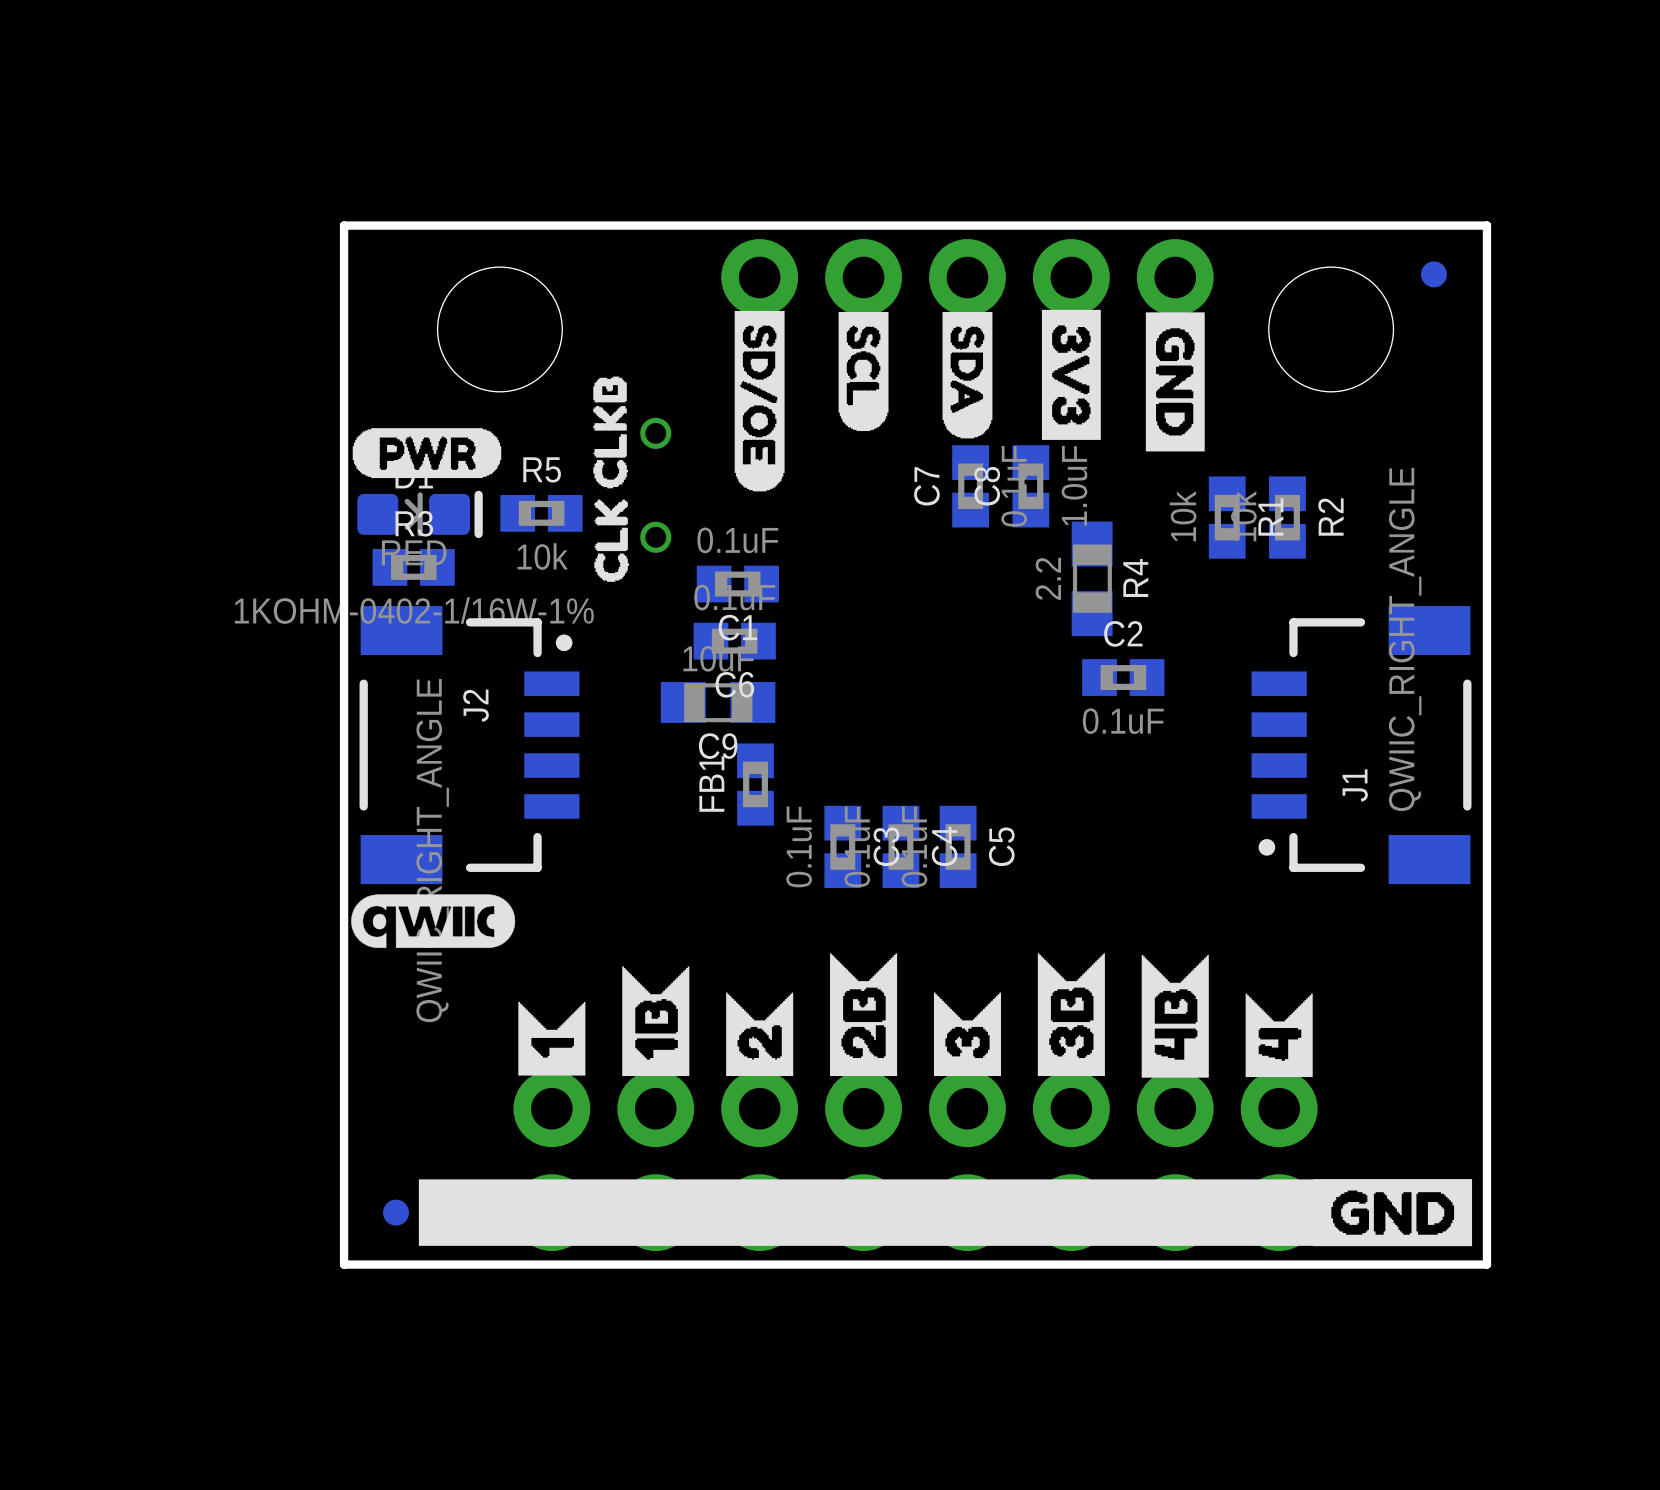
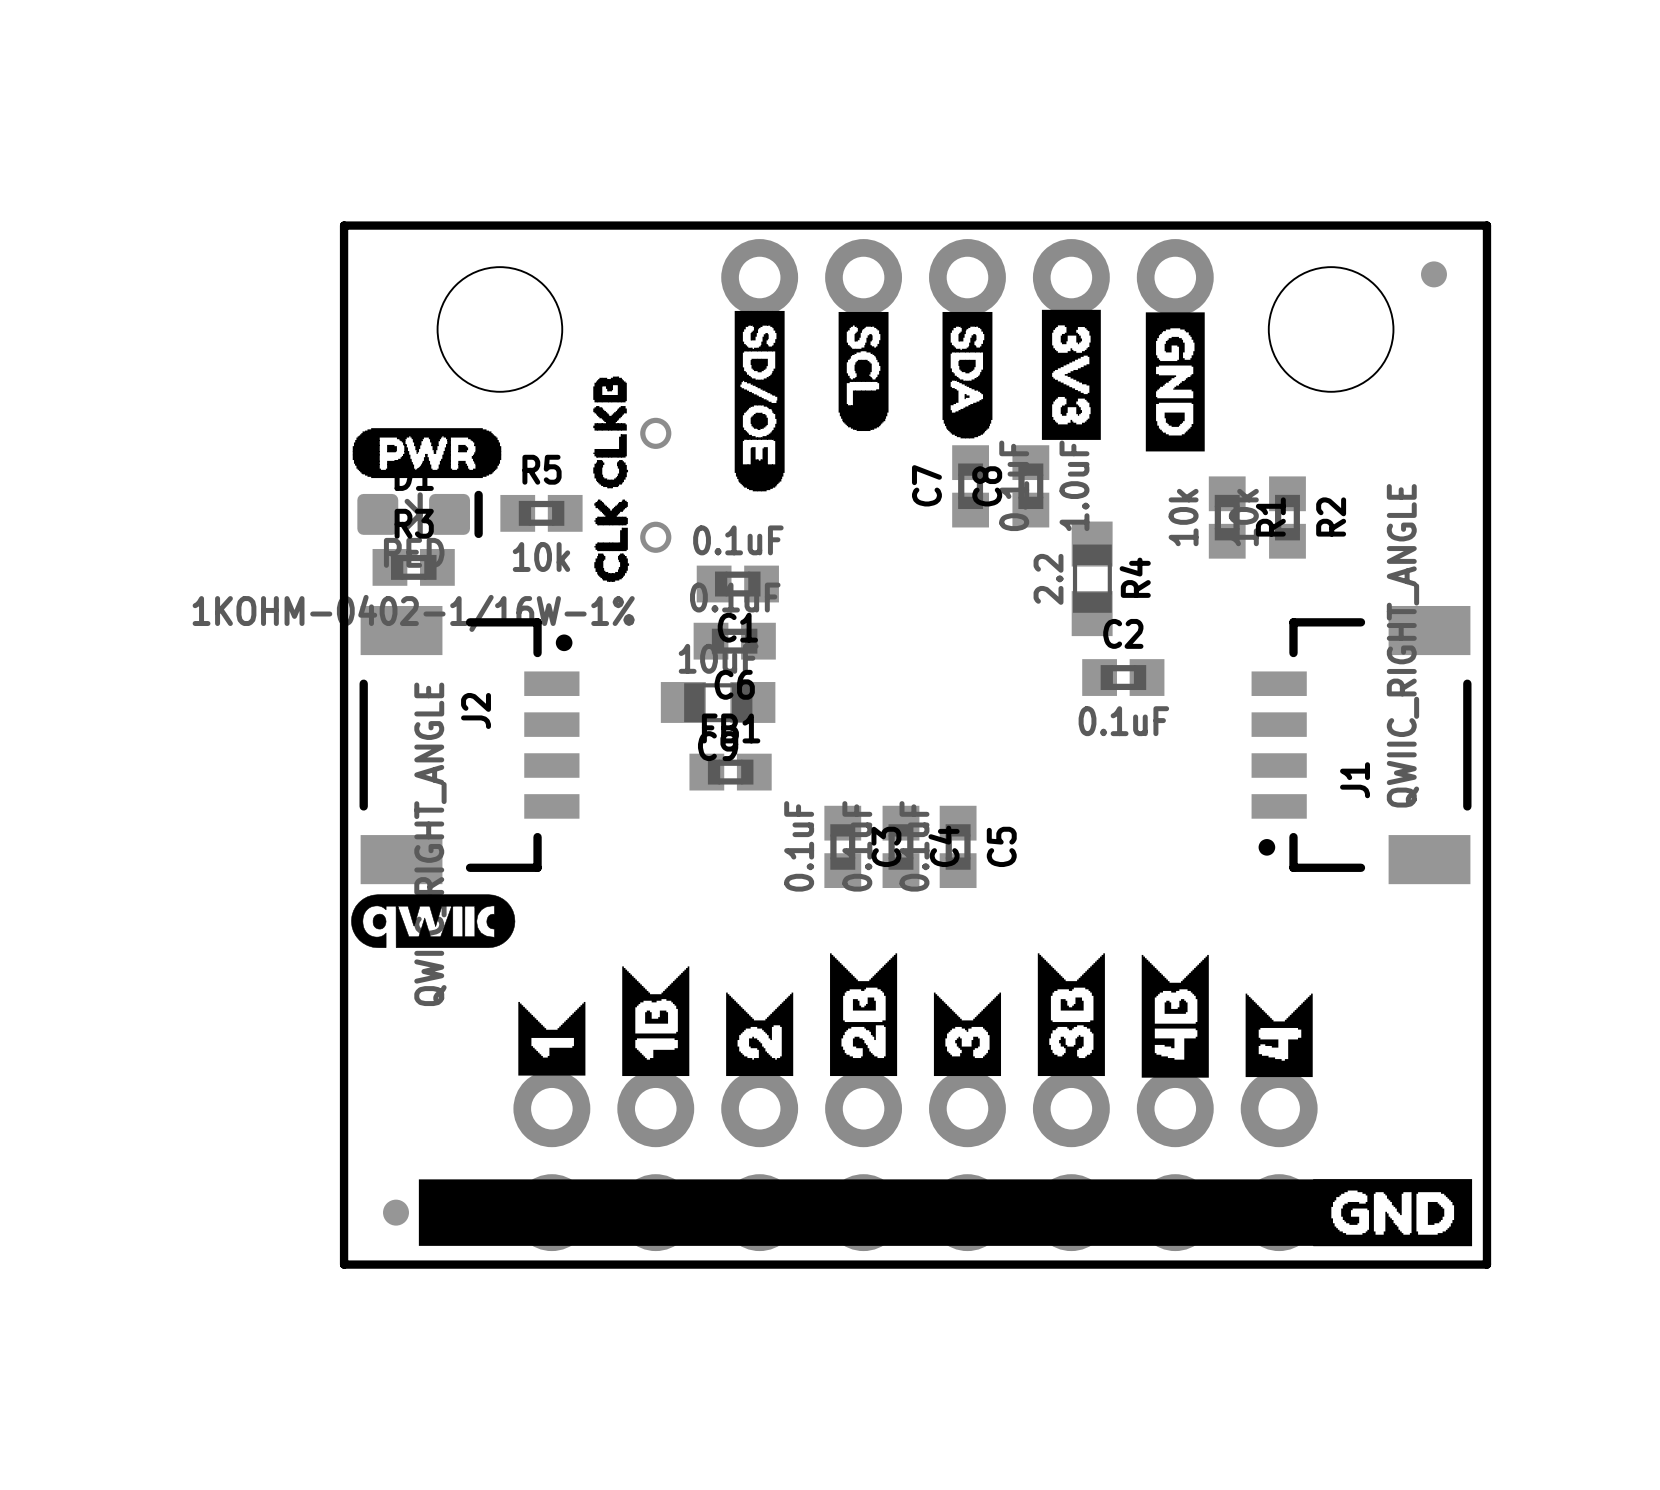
FB1 rotation: 0° (755, 784) -> 90° clockwise (730, 772)

